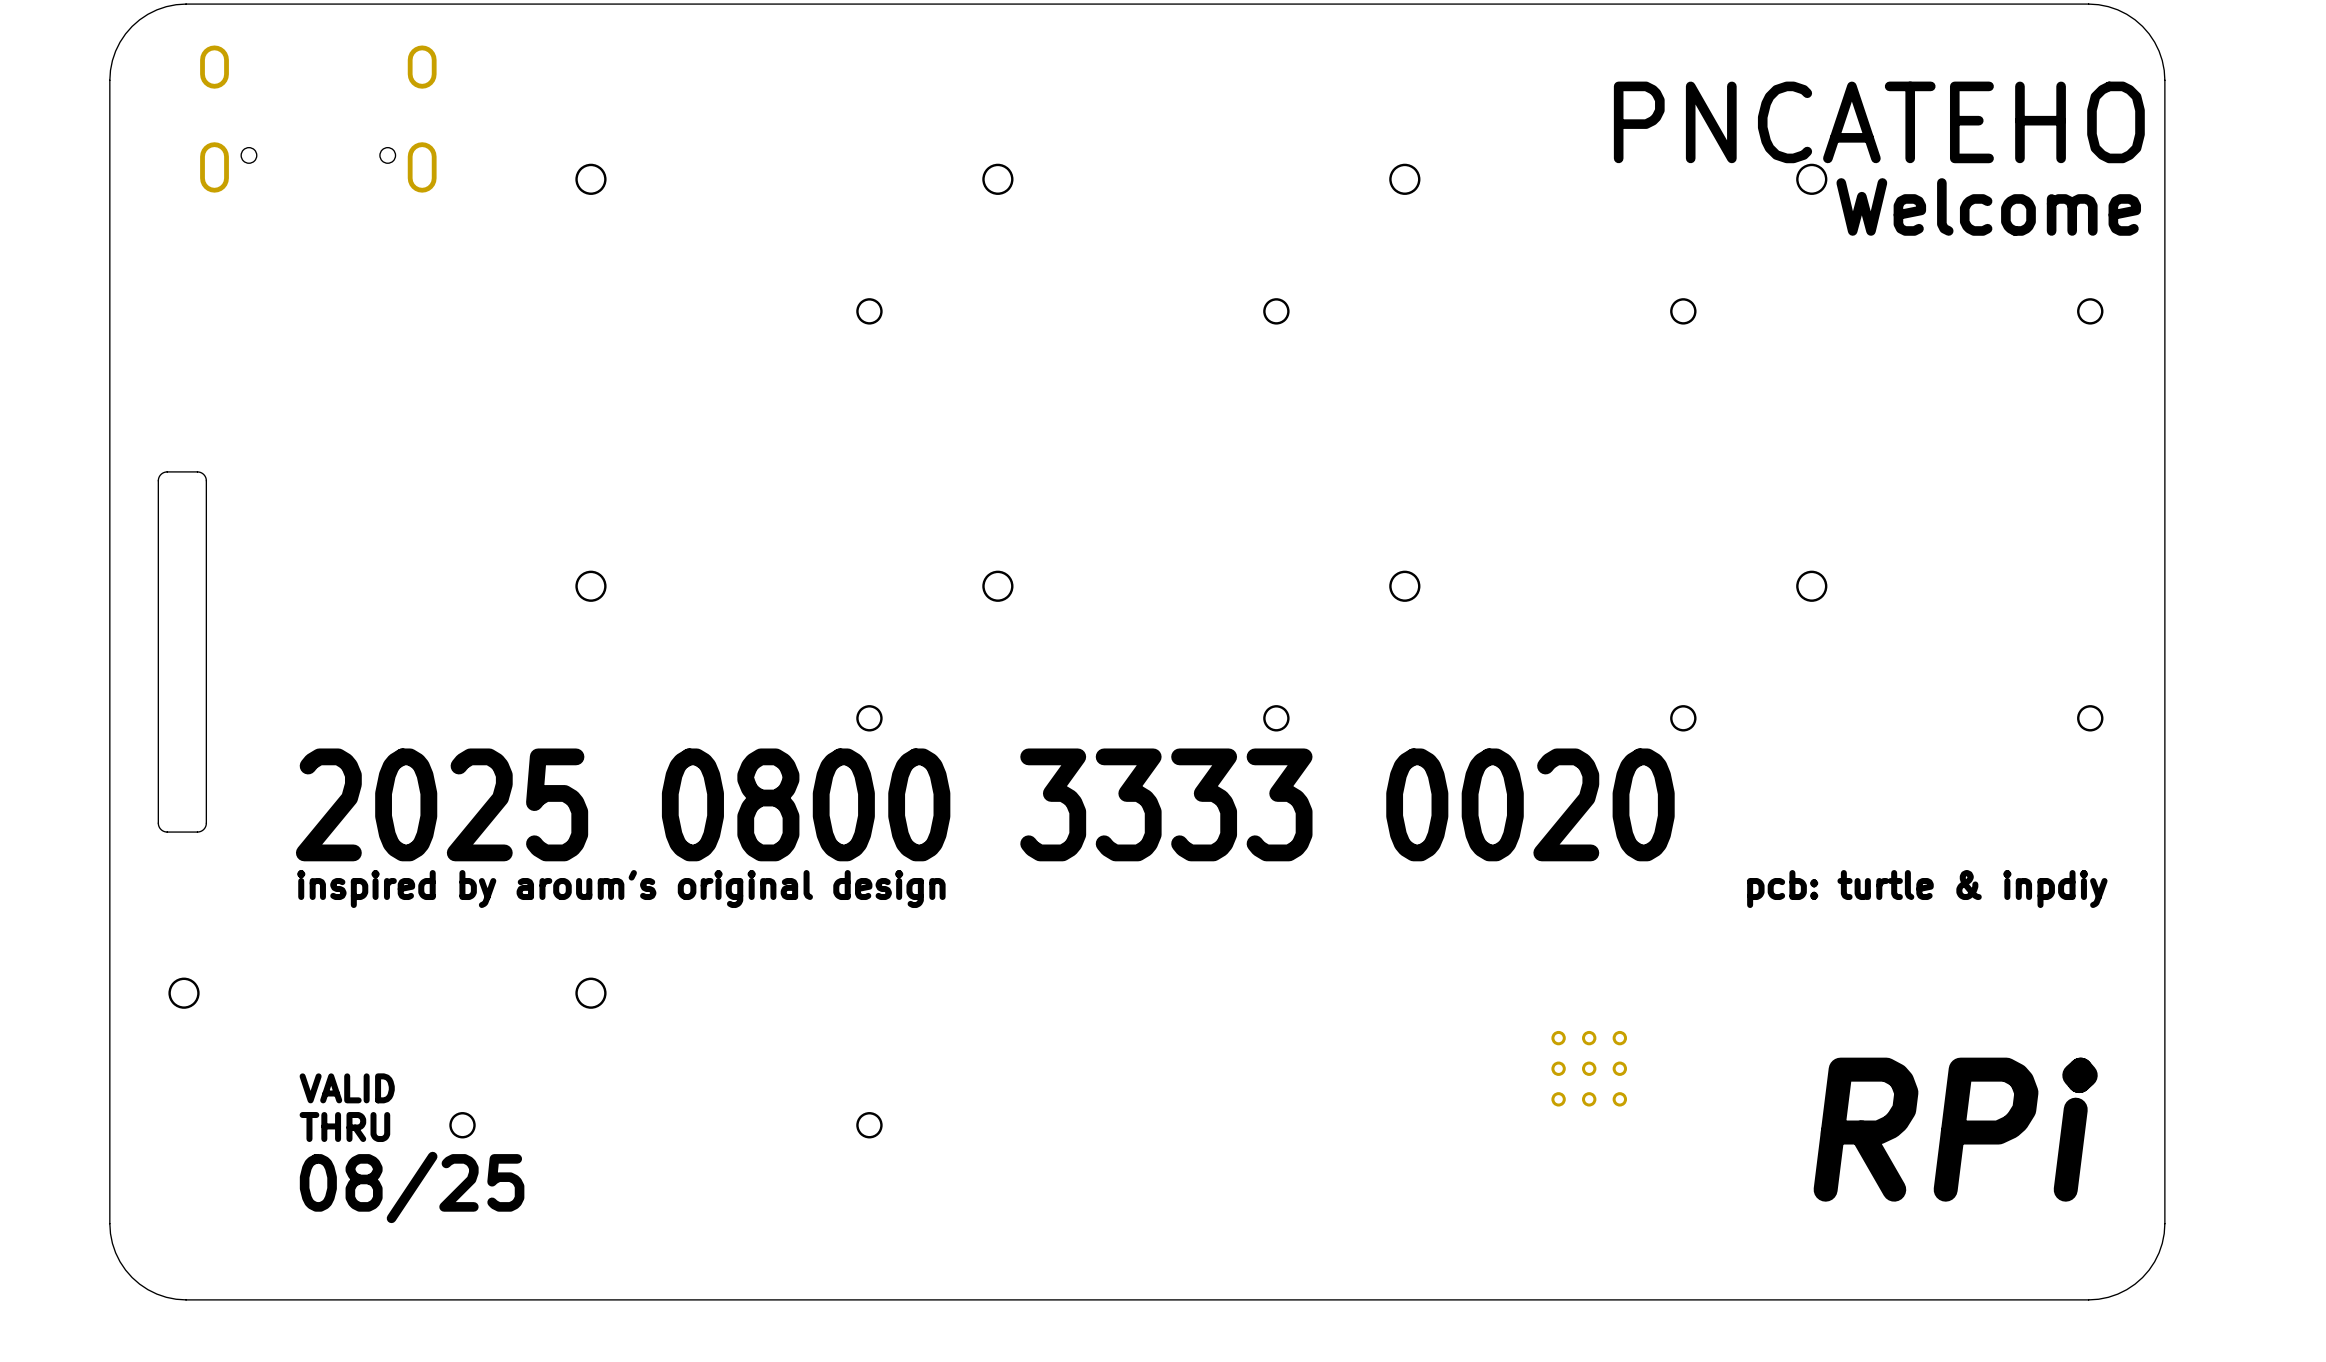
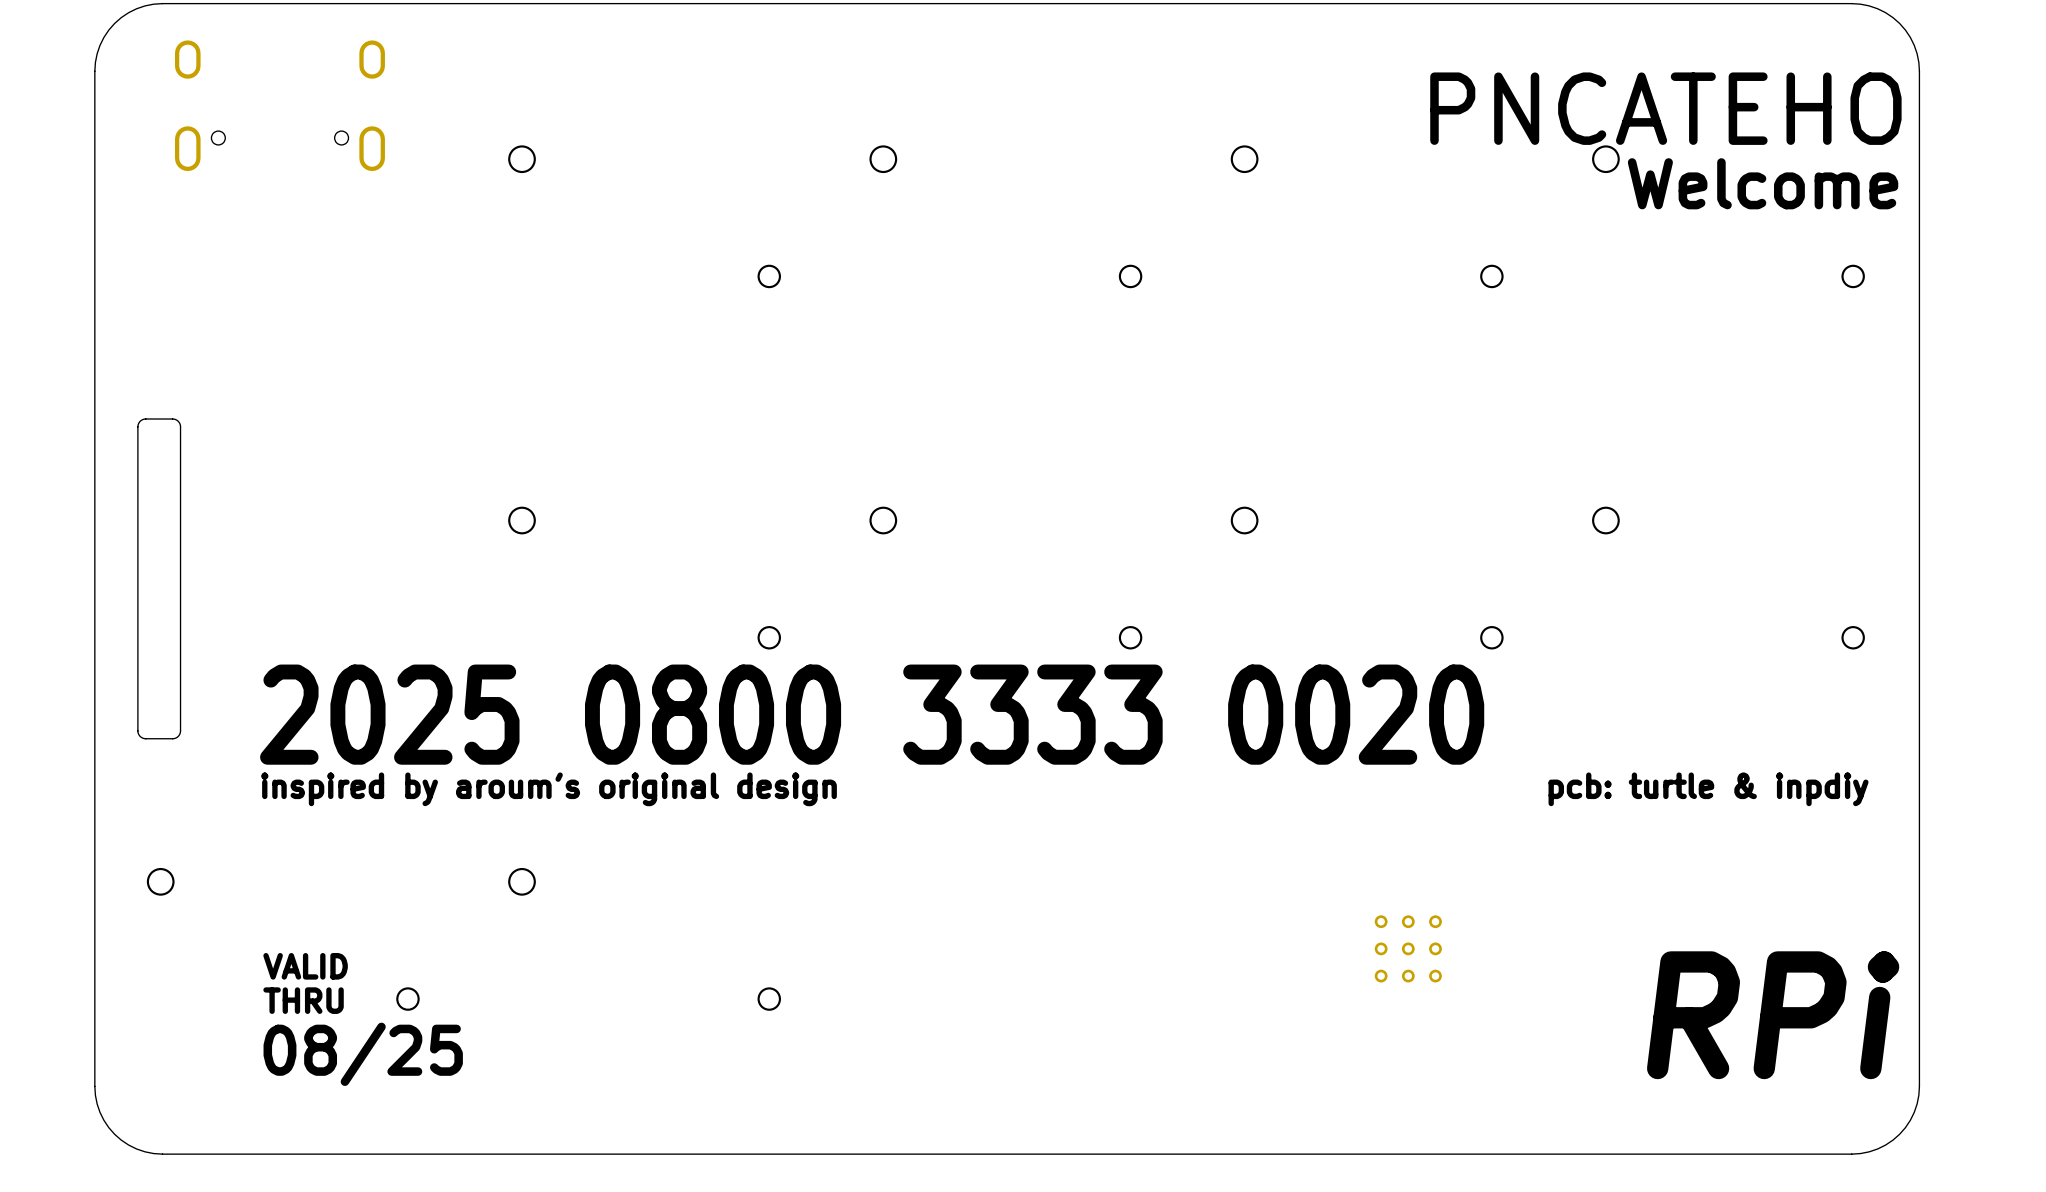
text position: RPi (1955, 1129) -> RPi (1773, 1015)

